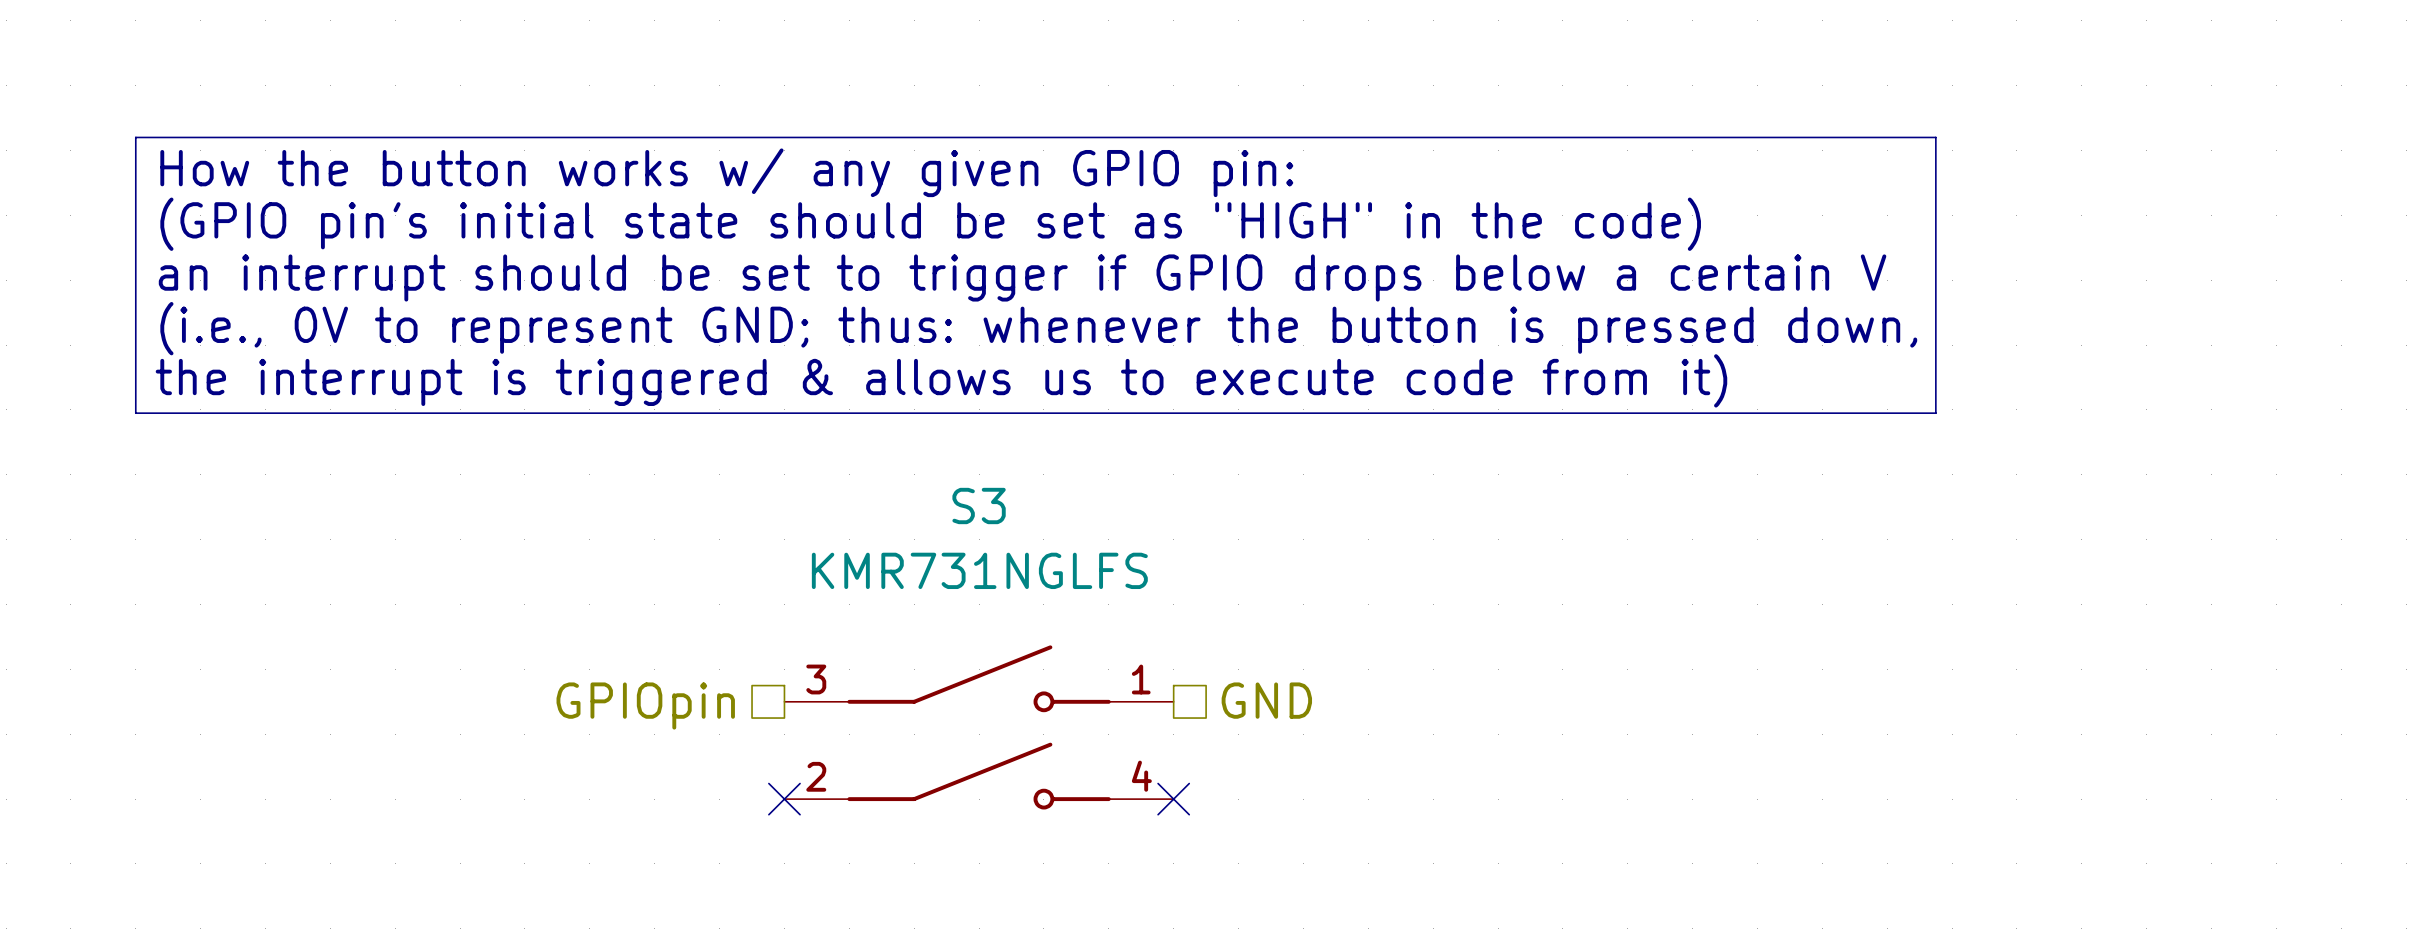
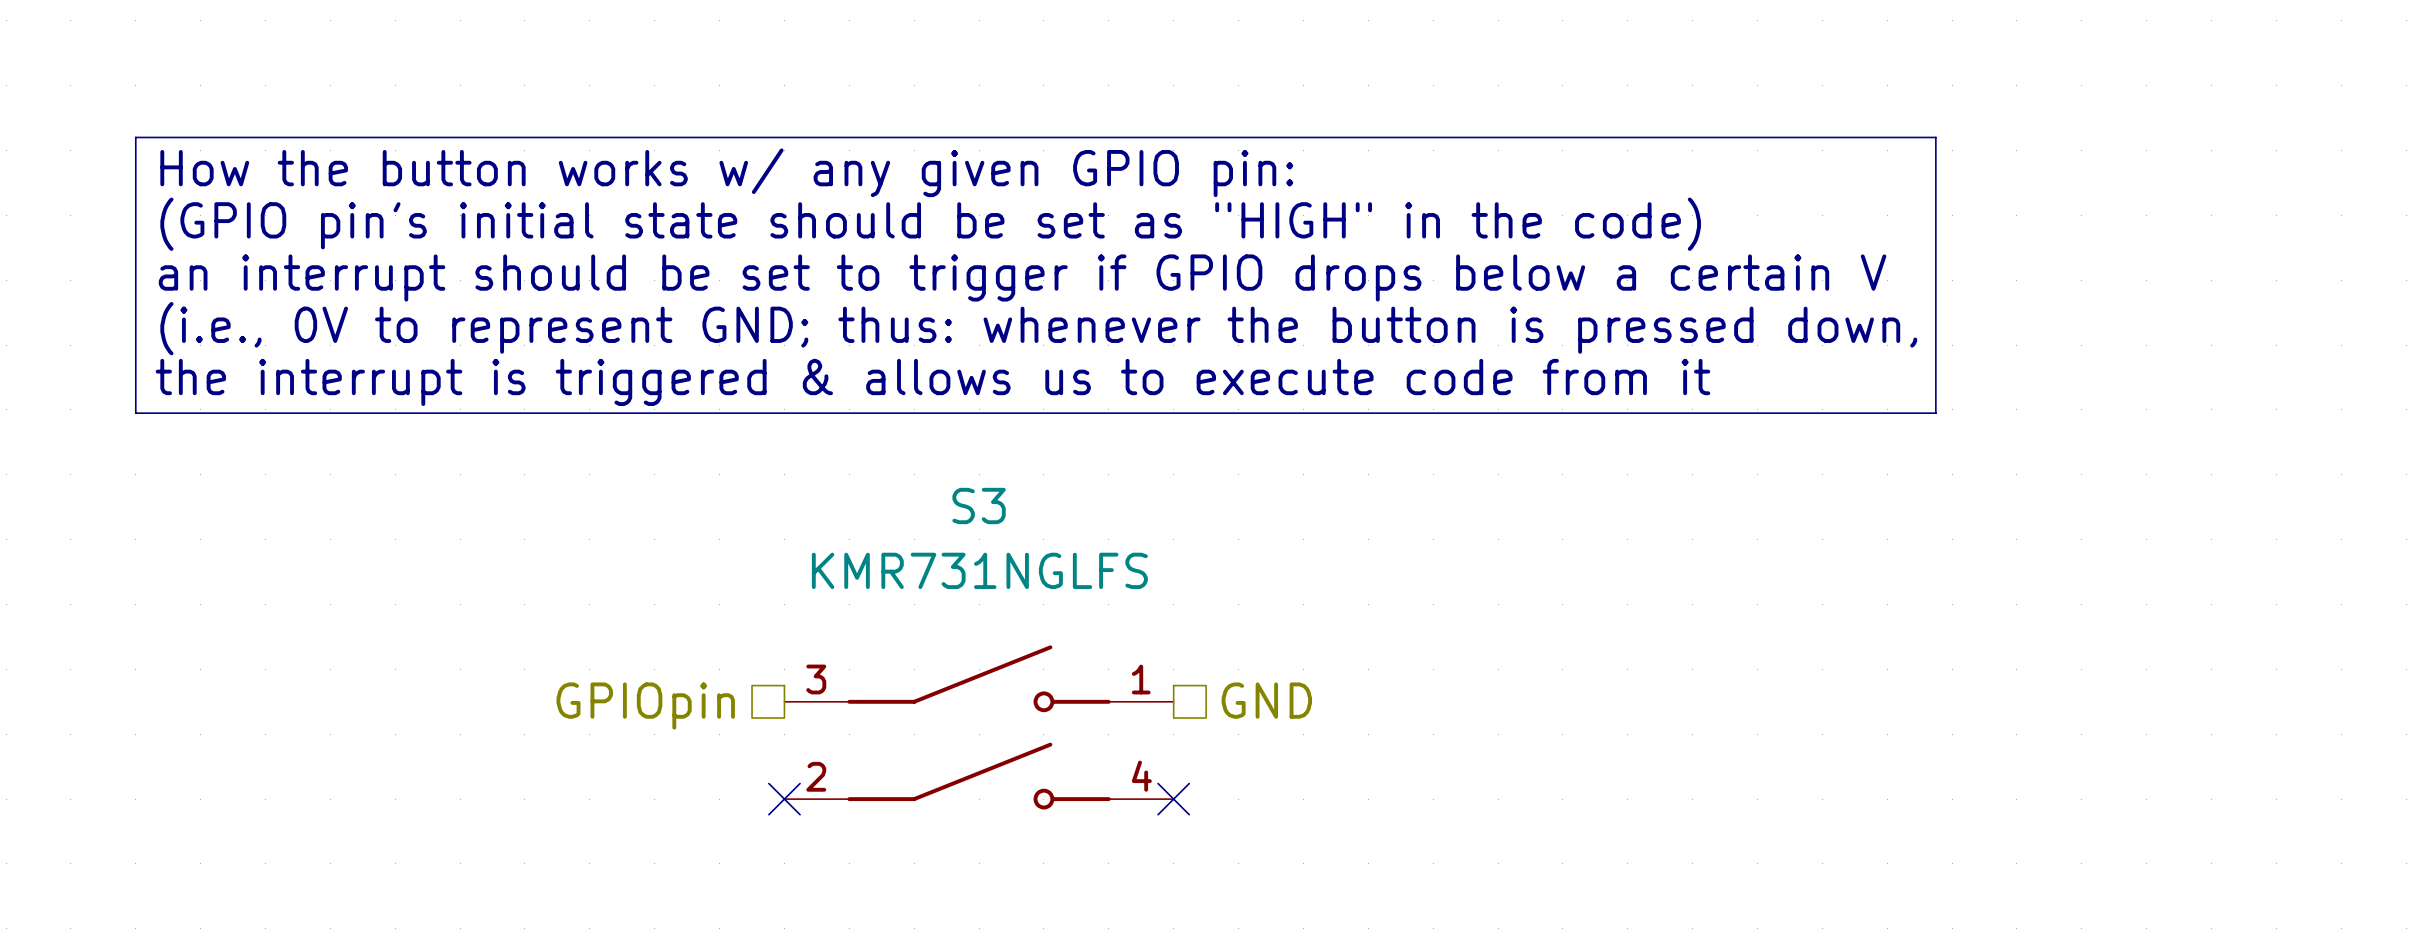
text: the interrupt is triggered & allows us to execute code from it) (941, 380) -> the interrupt is triggered & allows us to execute code from it (932, 382)

